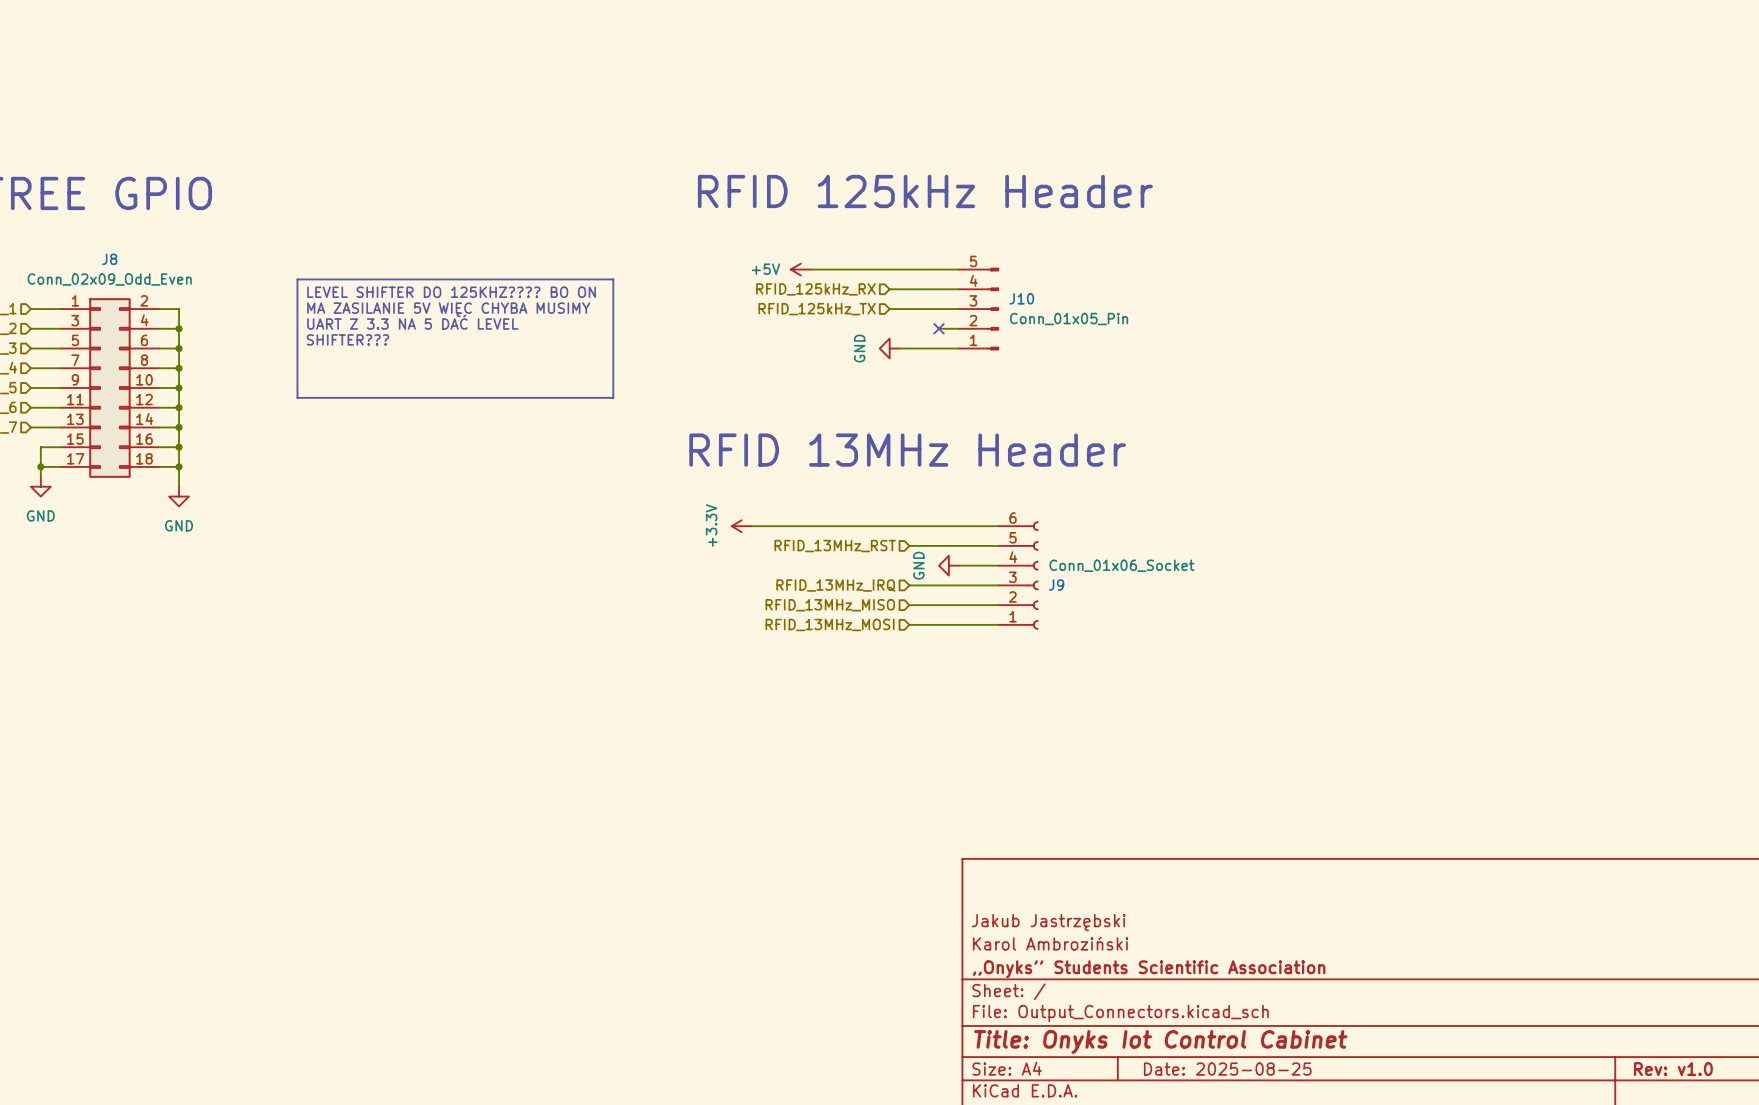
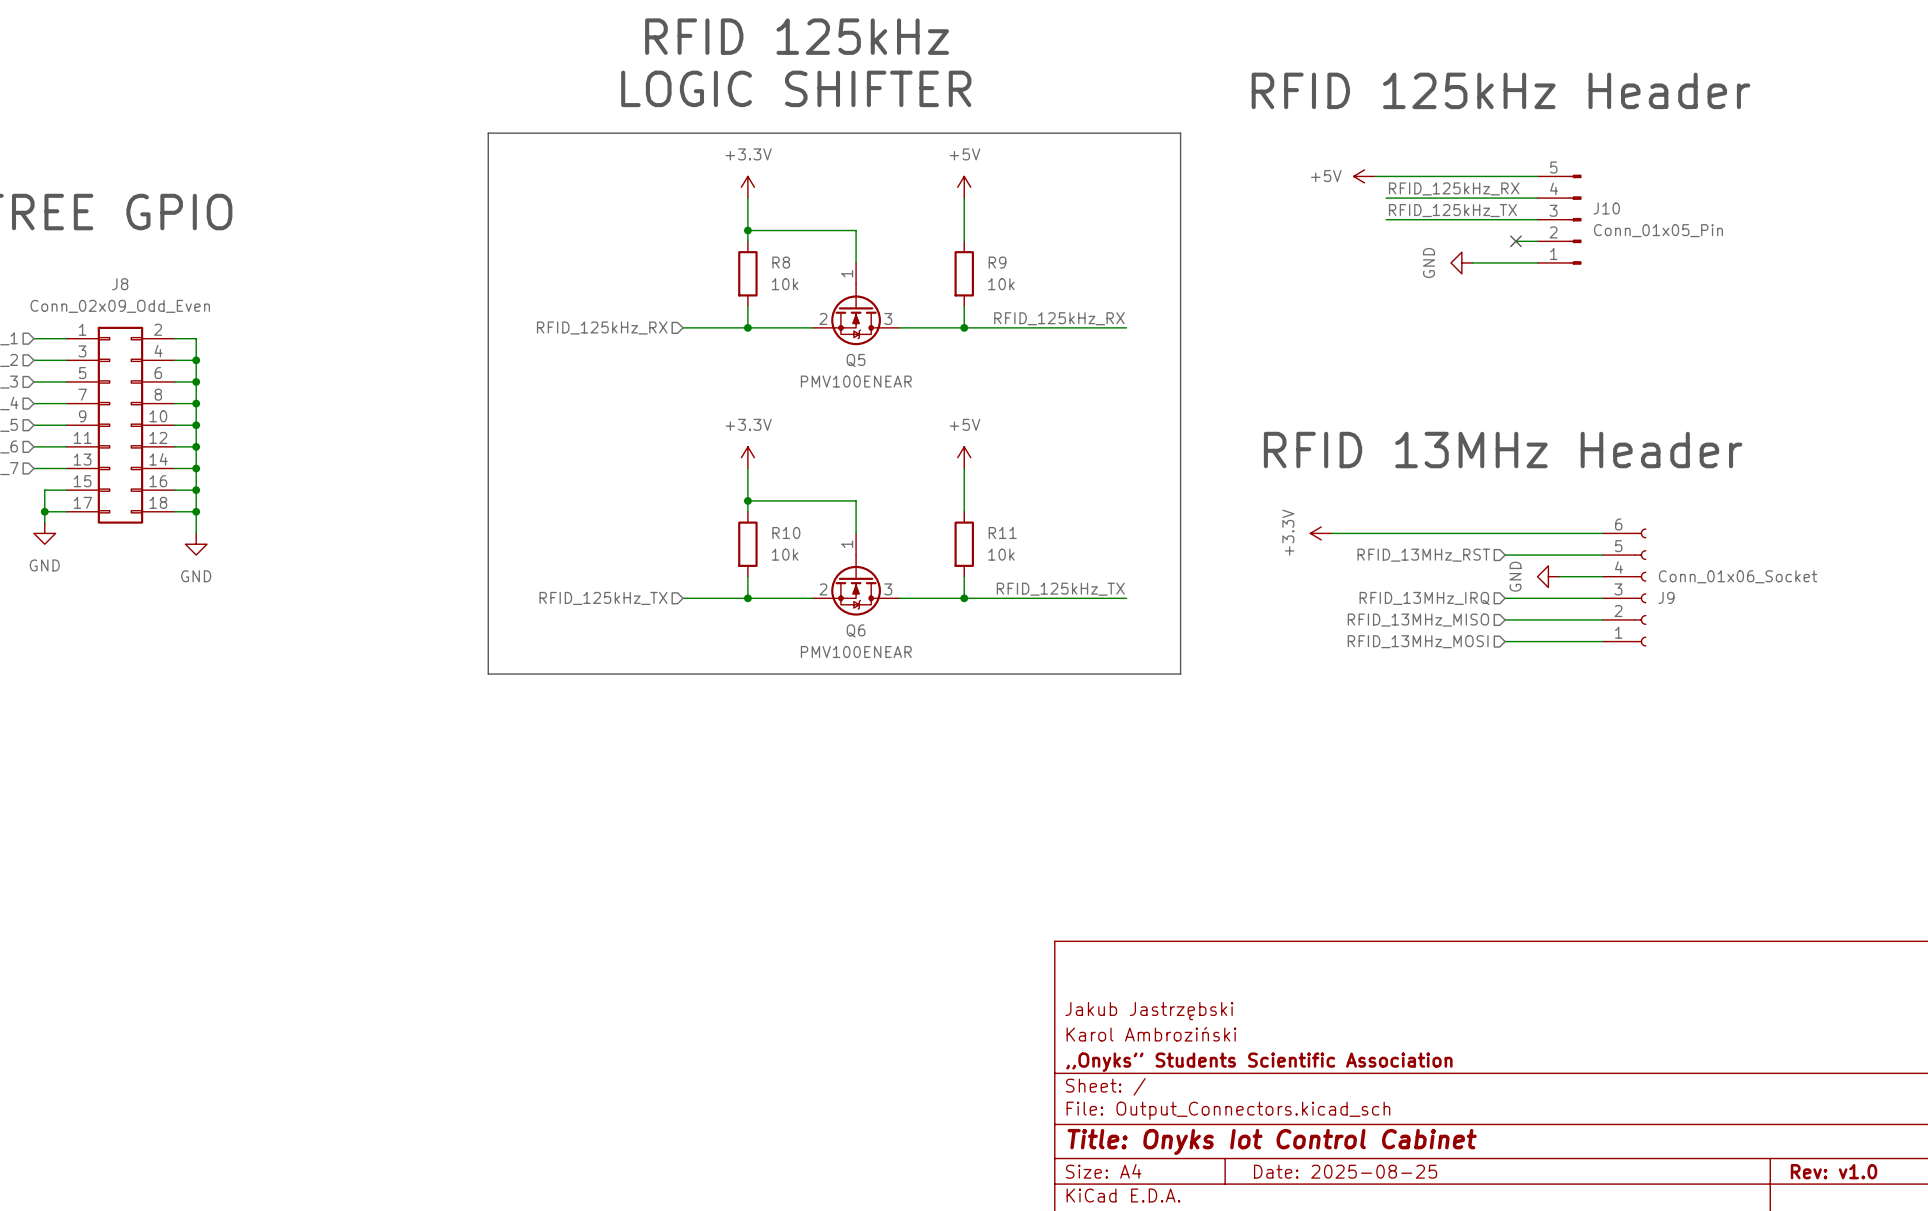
text: none -> RFID 125kHz (797, 36)
text: none -> LOGIC SHIFTER (796, 88)
text: none -> RFID 125kHz Header (1500, 90)
line: none -> (488, 133) (1180, 133) (1180, 674) (488, 674) (488, 133)
power symbol: none -> +5V (1364, 176)
wire: none -> (1375, 176) (1537, 176)
power symbol: none -> +3.3V (747, 187)
power symbol: none -> +5V (964, 187)
label: none -> RFID_125kHz_RX (1454, 188)
wire: none -> (747, 198) (747, 241)
wire: none -> (964, 198) (964, 241)
wire: none -> (1386, 198) (1537, 198)
text: RFID 125kHz Header (925, 191) -> none
label: none -> RFID_125kHz_TX (1452, 210)
wire: none -> (1386, 219) (1537, 219)
wire: none -> (747, 230) (856, 230) (856, 262)
junction: none -> (747, 230)
wire: none -> (1515, 241) (1537, 241)
no-connect mark: none -> (1515, 241)
power symbol: none -> GND (1461, 262)
wire: none -> (1472, 262) (1537, 262)
R8: none -> 10k (747, 273)
R9: none -> 10k (964, 273)
power symbol: +5V (800, 269) -> none
wire: (810, 269) (958, 269) -> none
Q5: none -> PMV100ENEAR (856, 304)
line: (297, 279) (613, 279) (613, 397) (297, 397) (297, 279) -> none
wire: none -> (747, 306) (747, 327)
hierarchical label: RFID_125kHz_RX (815, 289) -> none
wire: (889, 289) (958, 289) -> none
label: none -> RFID_125kHz_RX (1059, 318)
text: LEVEL SHIFTER DO 125KHZ???? BO ON (451, 292) -> none
hierarchical label: none -> RFID_125kHz_RX (602, 327)
wire: none -> (682, 327) (812, 327)
junction: none -> (747, 327)
wire: none -> (899, 327) (1126, 327)
junction: none -> (964, 327)
text: MA ZASILANIE 5V WIĘC CHYBA MUSIMY (448, 309) -> none
hierarchical label: RFID_125kHz_TX (817, 309) -> none
wire: (889, 309) (958, 309) -> none
J10 position: (978, 309) -> (1559, 219)
text: UART Z 3.3 NA 5 DAĆ LEVEL (412, 322) -> none
wire: (939, 328) (958, 328) -> none
no-connect mark: (939, 328) -> none
text: SHIFTER??? (347, 339) -> none
power symbol: GND (889, 348) -> none
wire: (899, 348) (958, 348) -> none
text: none -> RFID 13MHz Header (1503, 450)
power symbol: none -> +5V (964, 457)
wire: none -> (747, 468) (747, 511)
wire: none -> (964, 468) (964, 511)
text: RFID 13MHz Header (907, 450) -> none
wire: none -> (747, 500) (856, 500) (856, 533)
junction: none -> (747, 500)
power symbol: none -> +3.3V (1321, 533)
wire: none -> (1332, 533) (1602, 533)
R10: none -> 10k (747, 544)
R11: none -> 10k (964, 544)
hierarchical label: none -> RFID_13MHz_RST (1423, 555)
wire: none -> (1505, 555) (1602, 555)
Q6: none -> PMV100ENEAR (856, 574)
wire: none -> (747, 576) (747, 598)
power symbol rotation: 0° (741, 526) -> 90° clockwise (747, 457)
power symbol position: +3.3V (741, 526) -> +3.3V (747, 457)
wire: (751, 526) (998, 526) -> none
wire: none -> (964, 576) (964, 598)
power symbol: none -> GND (1548, 576)
wire: none -> (1559, 576) (1602, 576)
label: none -> RFID_125kHz_TX (1060, 589)
wire: none -> (682, 598) (812, 598)
junction: none -> (747, 598)
junction: none -> (964, 598)
wire: none -> (1505, 598) (1602, 598)
hierarchical label: none -> RFID_125kHz_TX (603, 598)
hierarchical label: RFID_13MHz_RST (835, 546) -> none
hierarchical label: none -> RFID_13MHz_IRQ (1424, 598)
power symbol: GND (948, 565) -> none
wire: (958, 565) (998, 565) -> none
hierarchical label: none -> RFID_13MHz_MISO (1418, 620)
wire: none -> (1505, 619) (1602, 619)
J9 position: (1018, 575) -> (1624, 587)
hierarchical label: RFID_13MHz_IRQ (835, 585) -> none
wire: (909, 585) (998, 585) -> (899, 598) (996, 598)
hierarchical label: none -> RFID_13MHz_MOSI (1418, 641)
wire: none -> (1505, 641) (1602, 641)
hierarchical label: RFID_13MHz_MISO (830, 605) -> none
wire: (909, 605) (998, 605) -> none
hierarchical label: RFID_13MHz_MOSI (830, 624) -> none
wire: (909, 624) (998, 624) -> none

